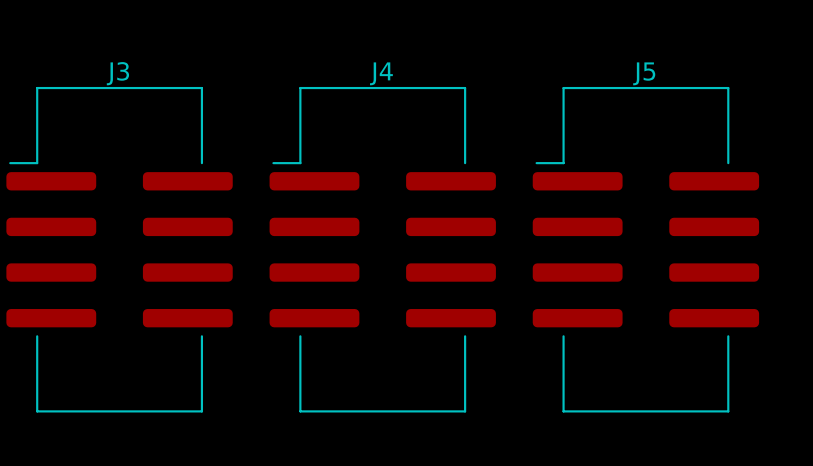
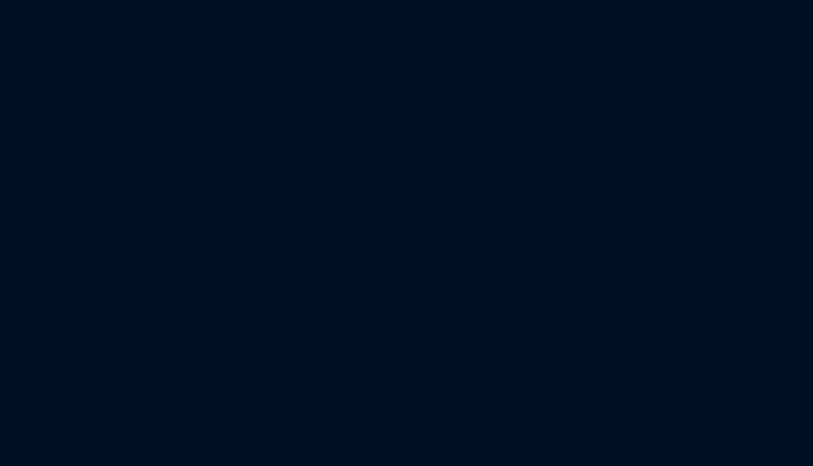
J3: (119, 249) -> none
J4: (382, 249) -> none
J5: (645, 249) -> none

